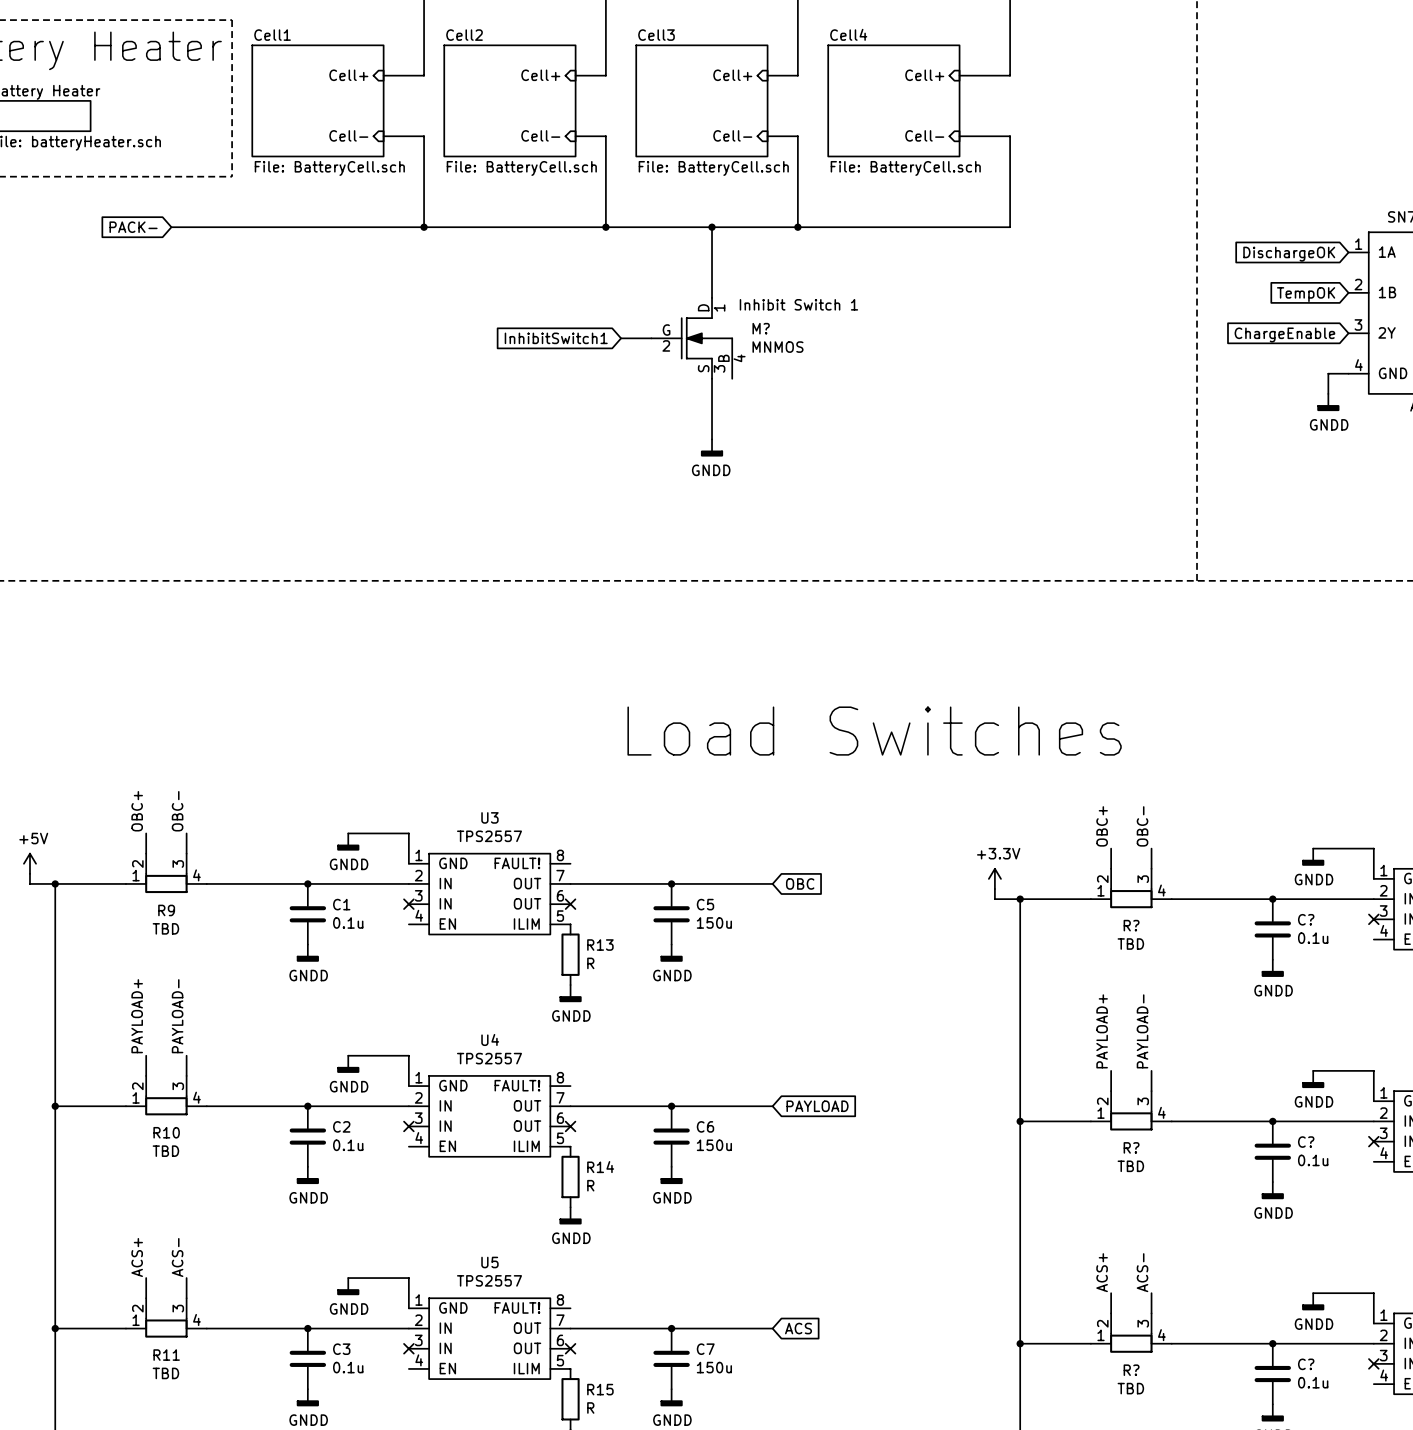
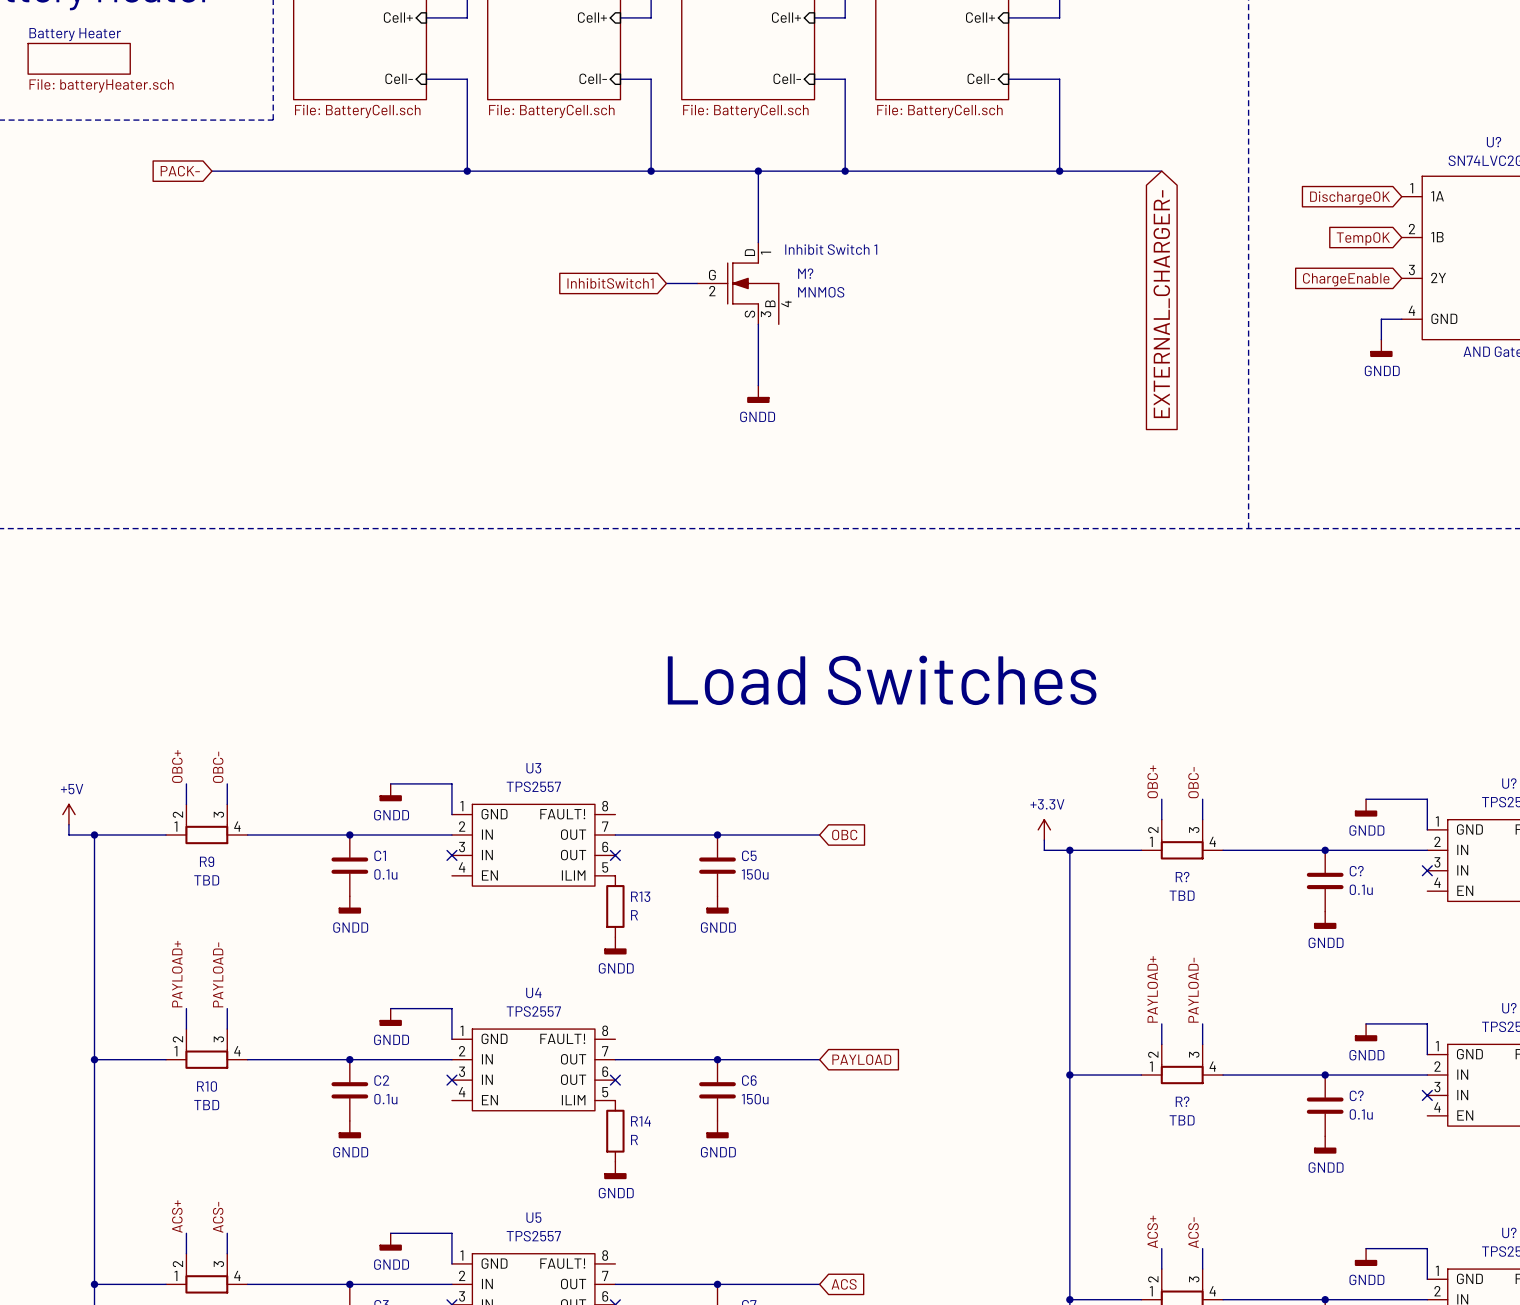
wire: none -> (1059, 171) (1161, 171)
junction: none -> (1059, 171)
global label: none -> EXTERNAL_CHARGER- (1161, 304)

